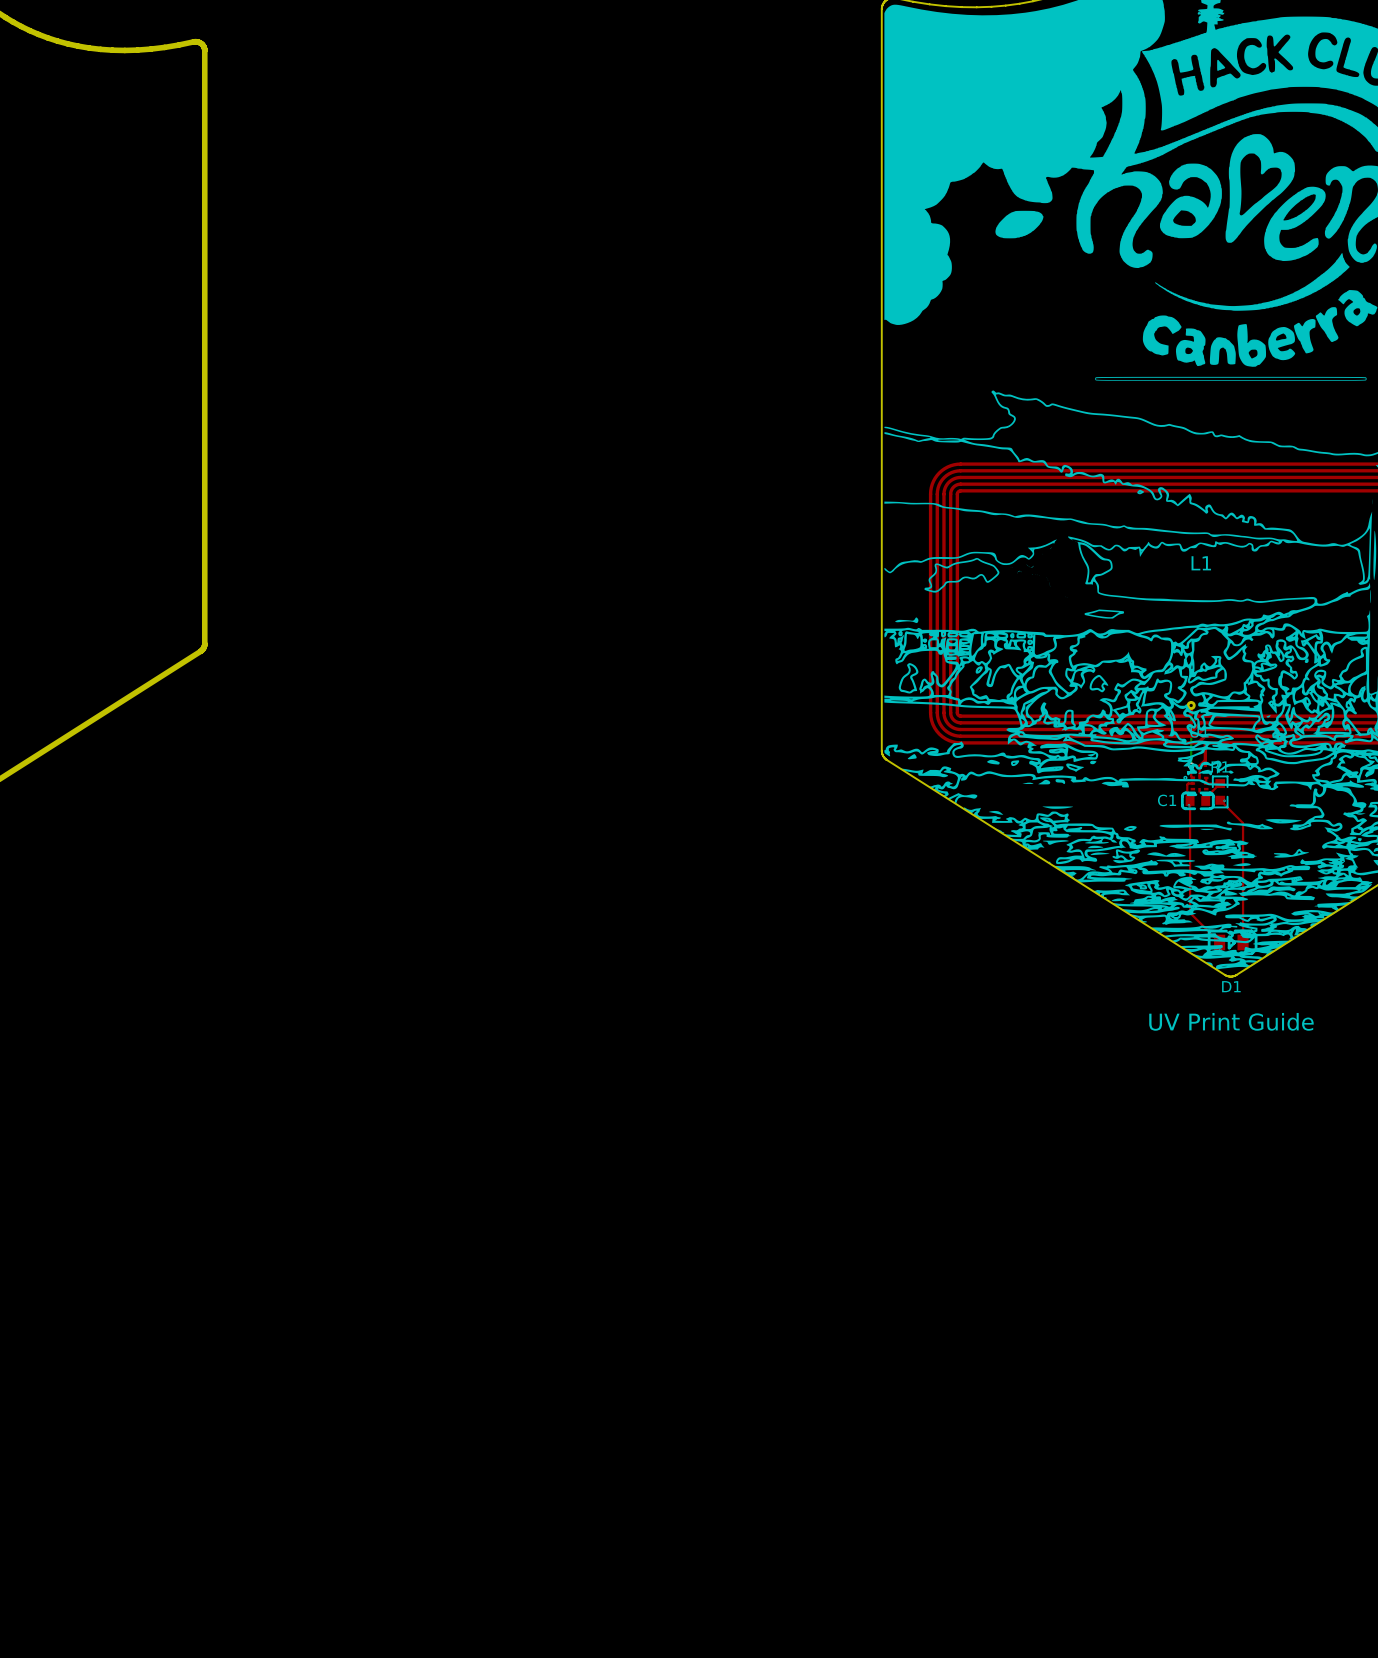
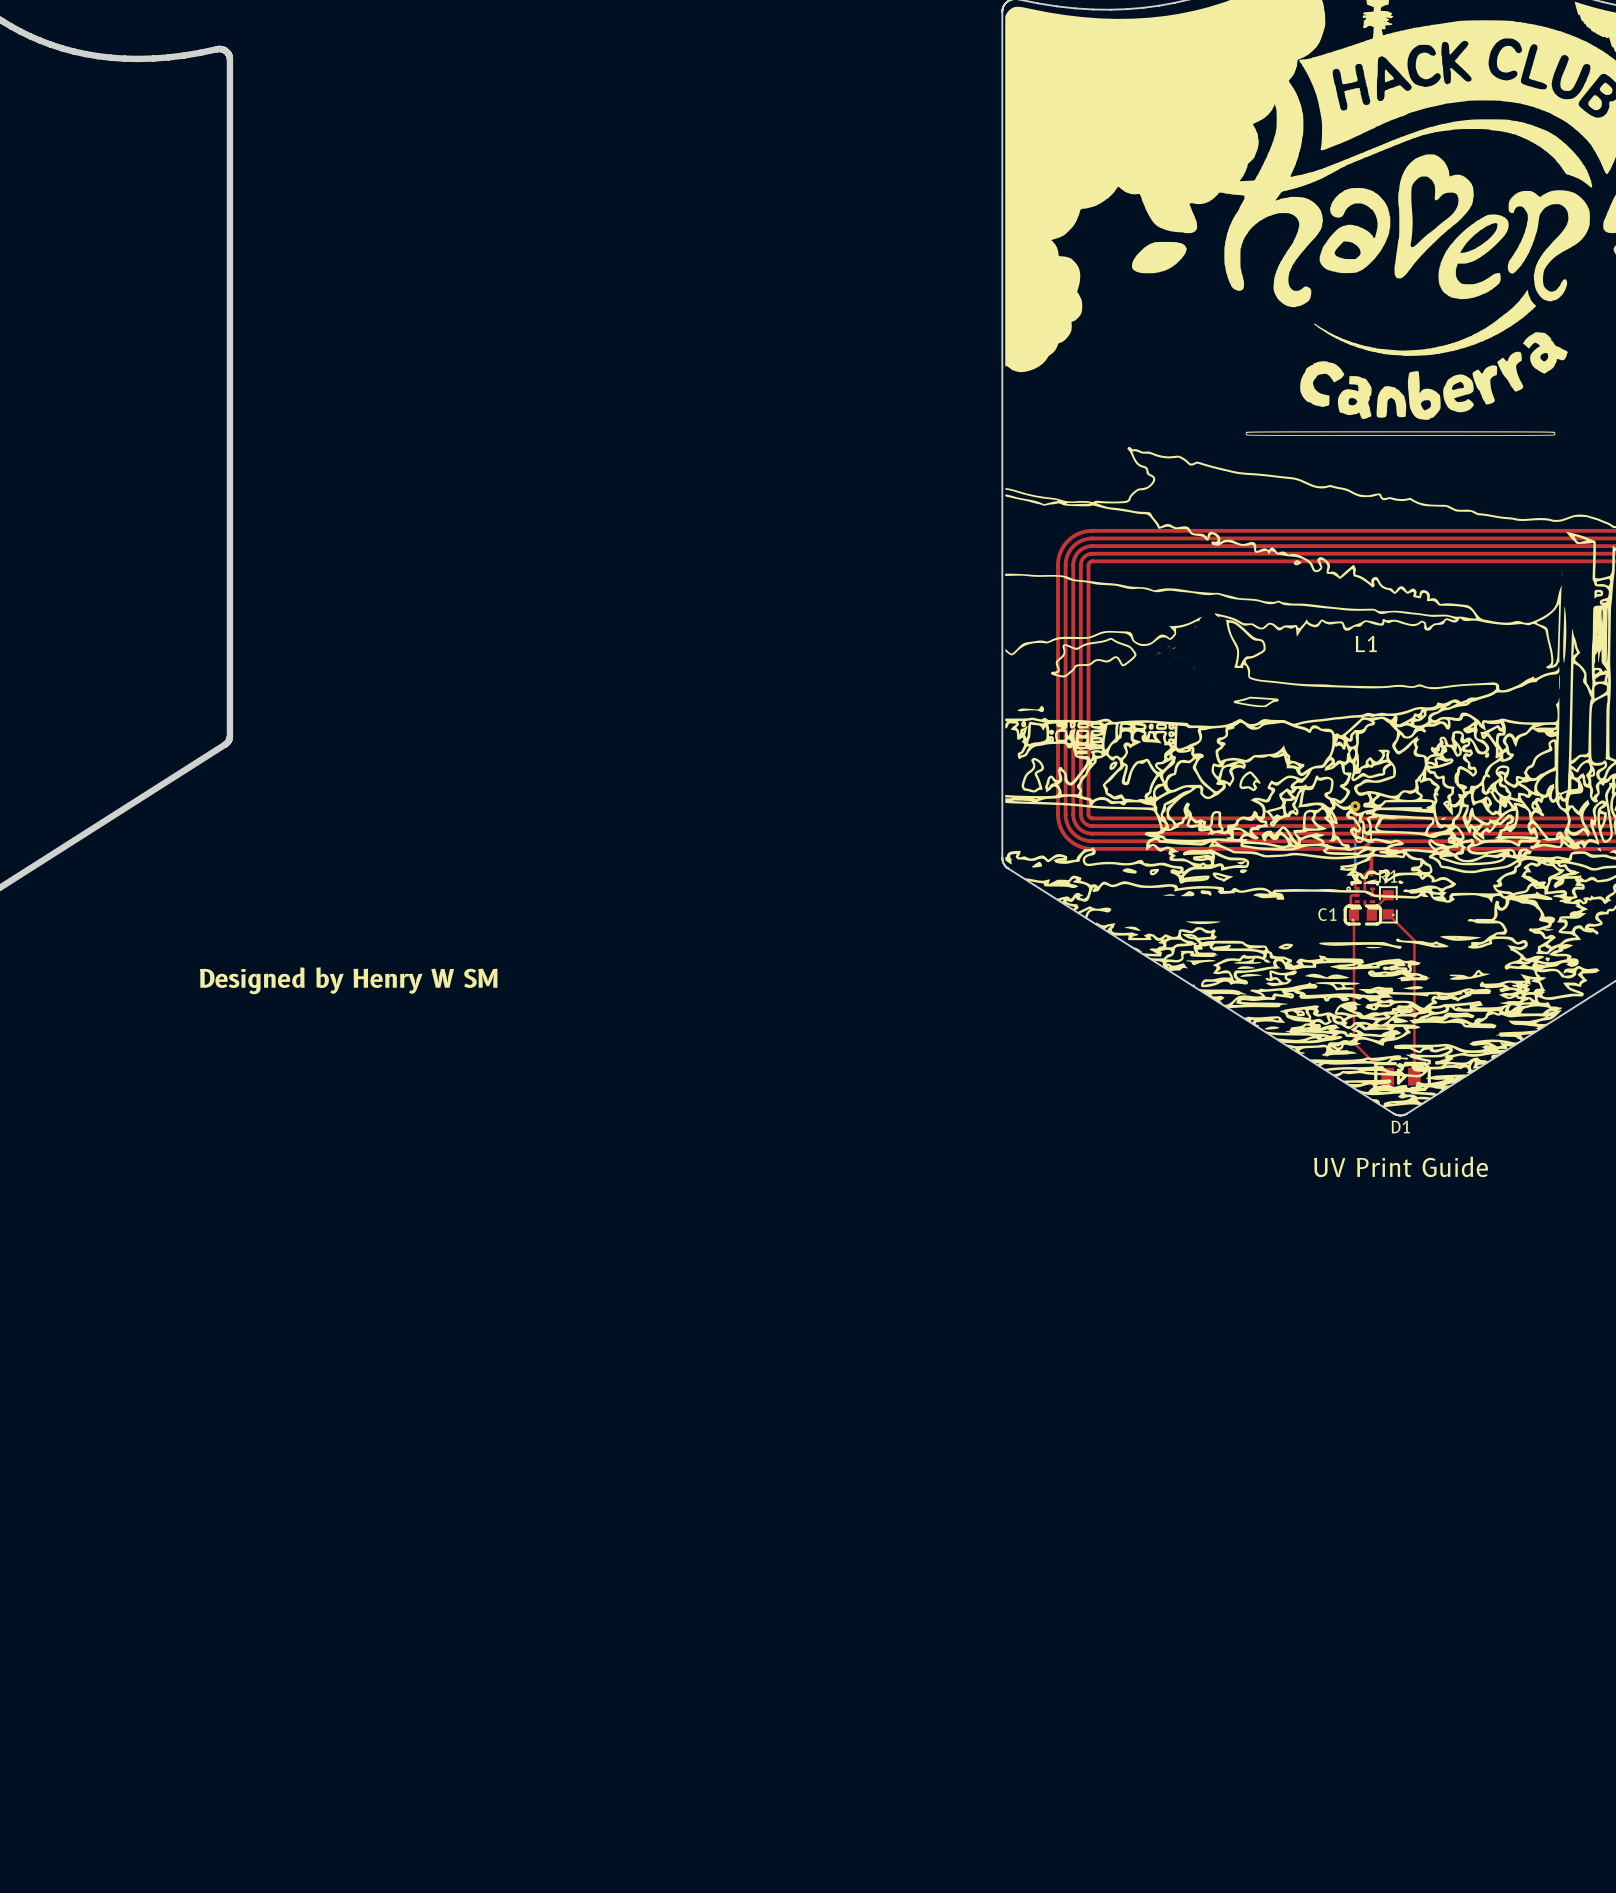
text: none -> Designed by Henry W SM (348, 980)

